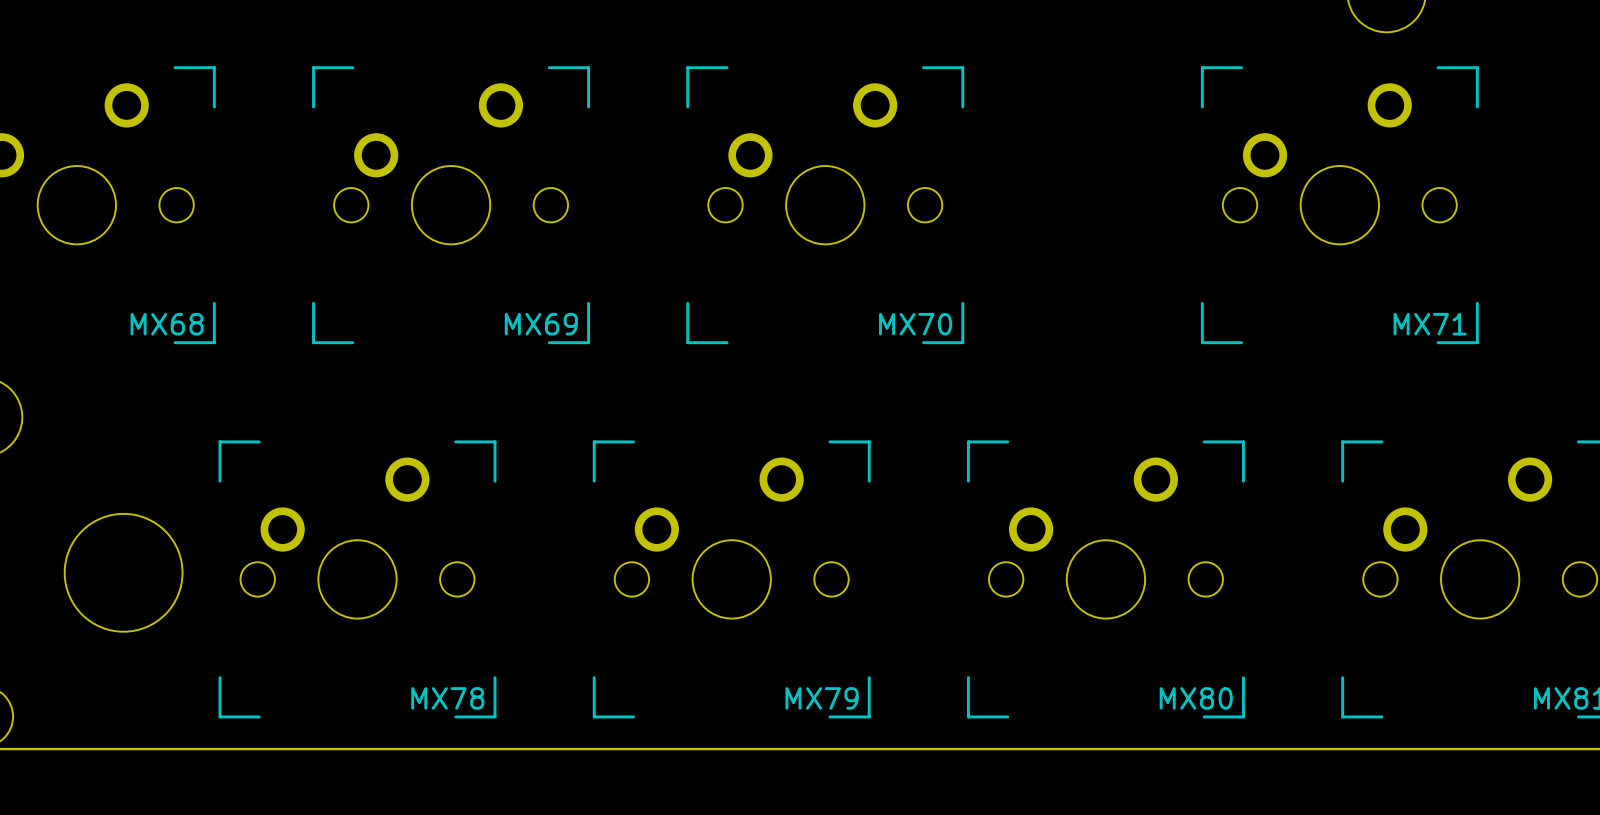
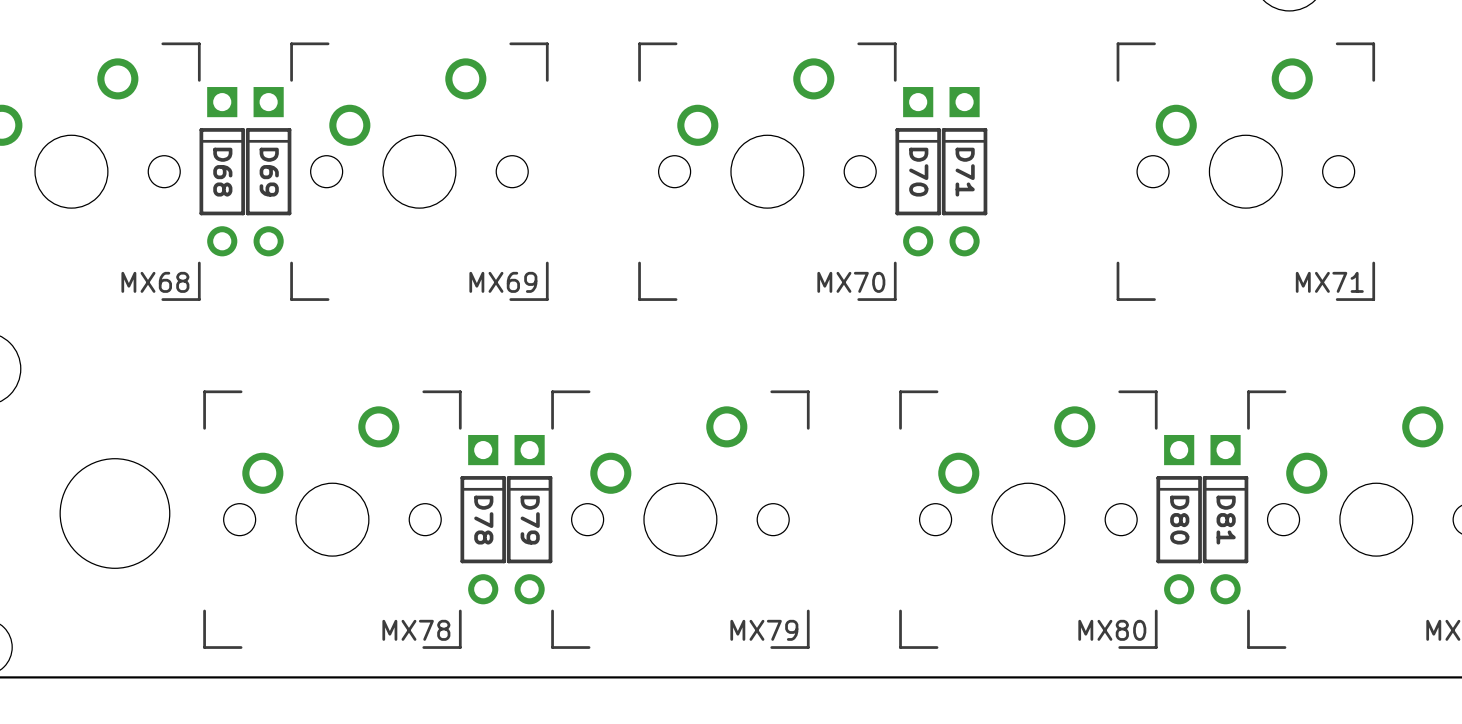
D68: none -> (222, 171)
D69: none -> (268, 171)
D70: none -> (918, 171)
D71: none -> (964, 171)
D78: none -> (483, 519)
D79: none -> (529, 519)
D80: none -> (1179, 519)
D81: none -> (1225, 519)

